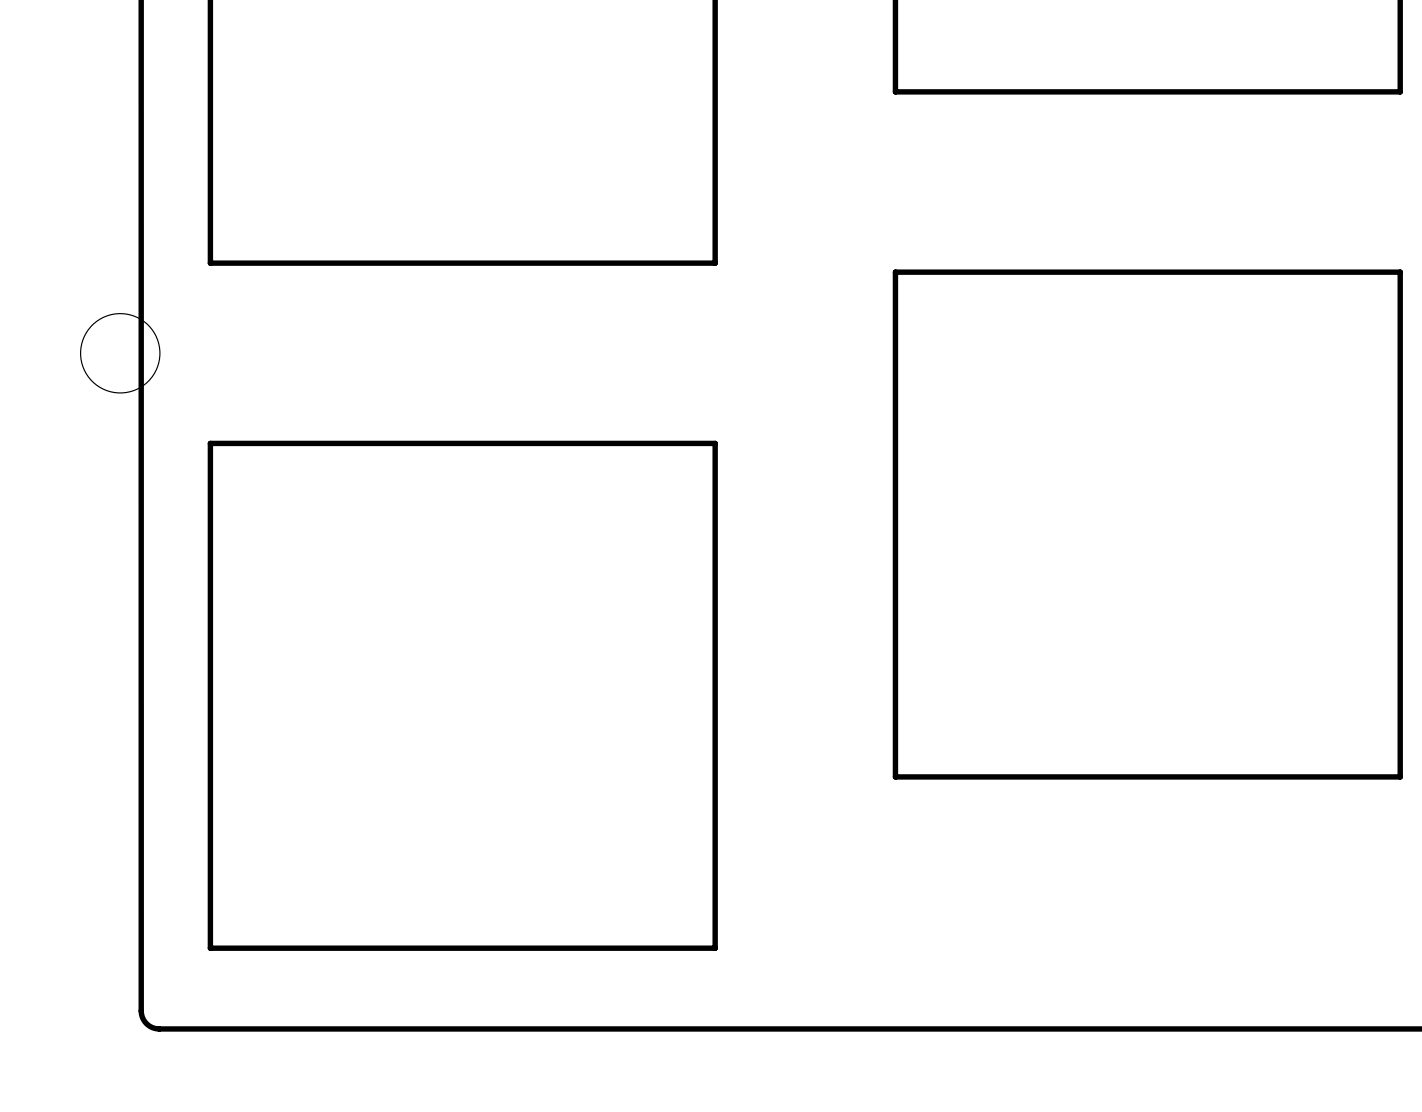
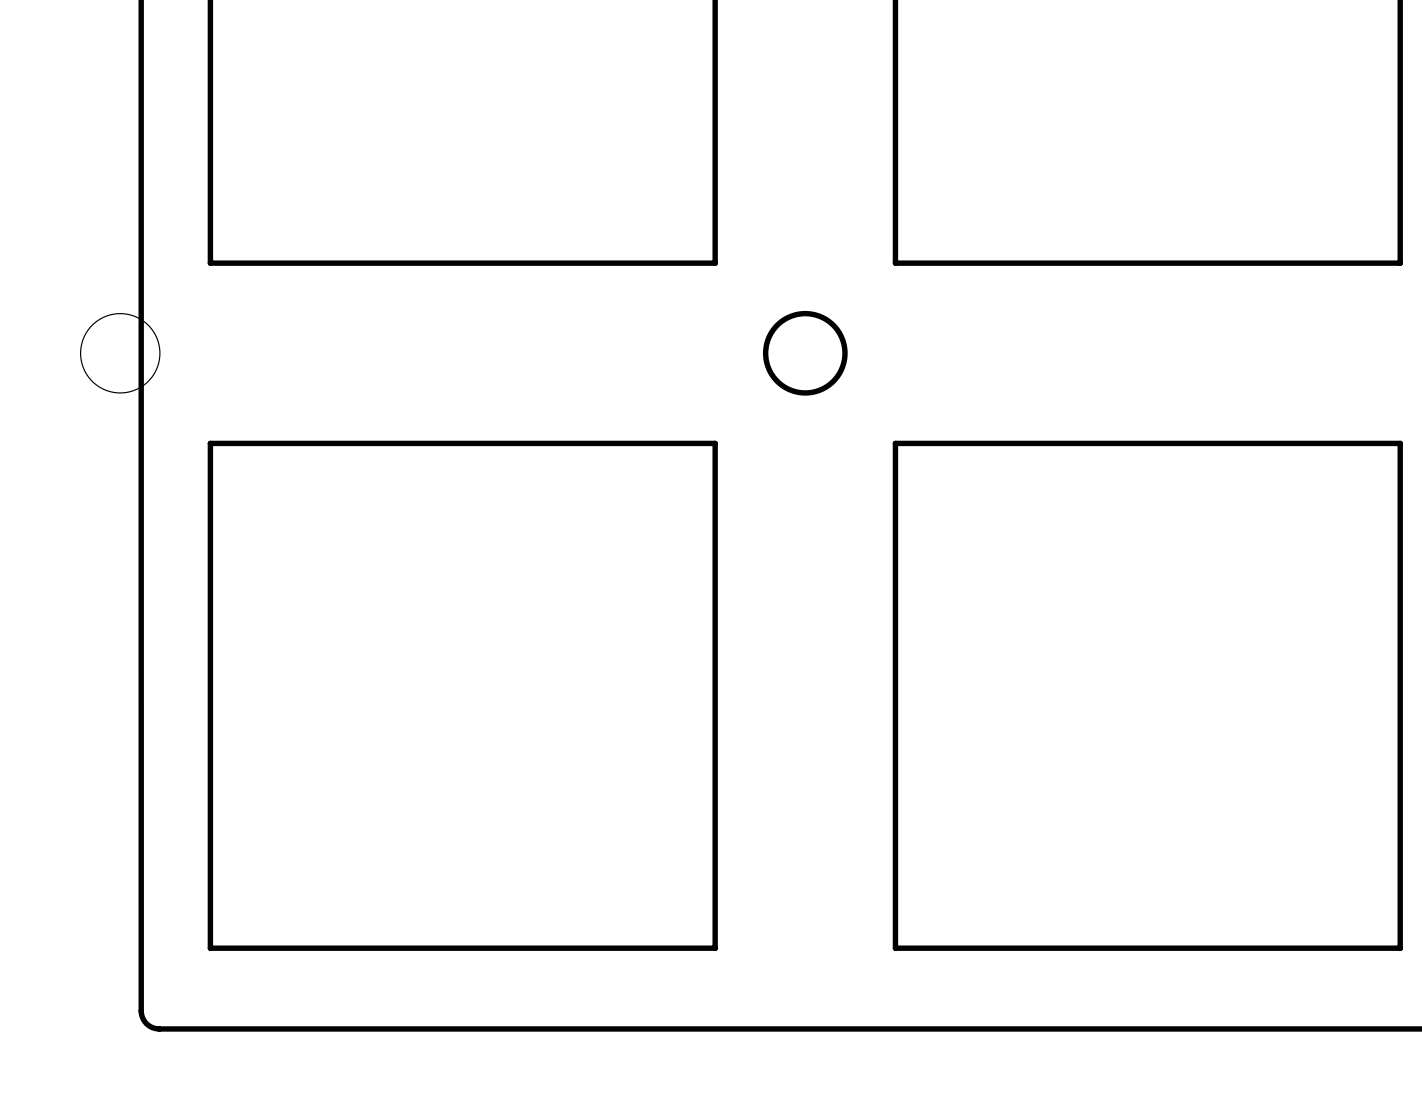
board edge: (895, 91) (1400, 91) -> (895, 91) (895, 263) (1400, 263) (1400, 91)
round board edge: none -> [762, 310, 848, 396]
board edge: (895, 443) (895, 272) (1400, 272) (1400, 443) -> (895, 443) (1400, 443)
board edge: (895, 776) (1400, 776) -> (895, 776) (895, 948) (1400, 948) (1400, 776)

